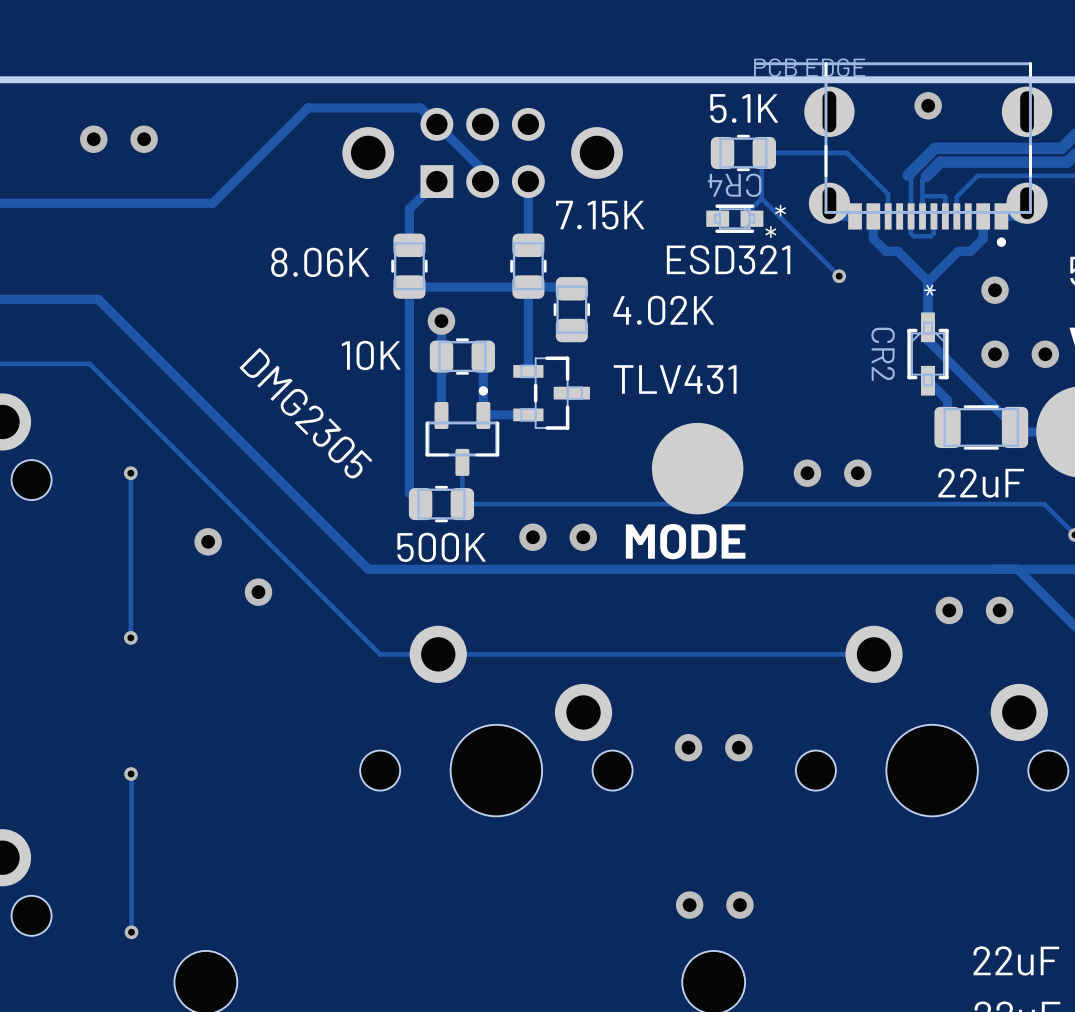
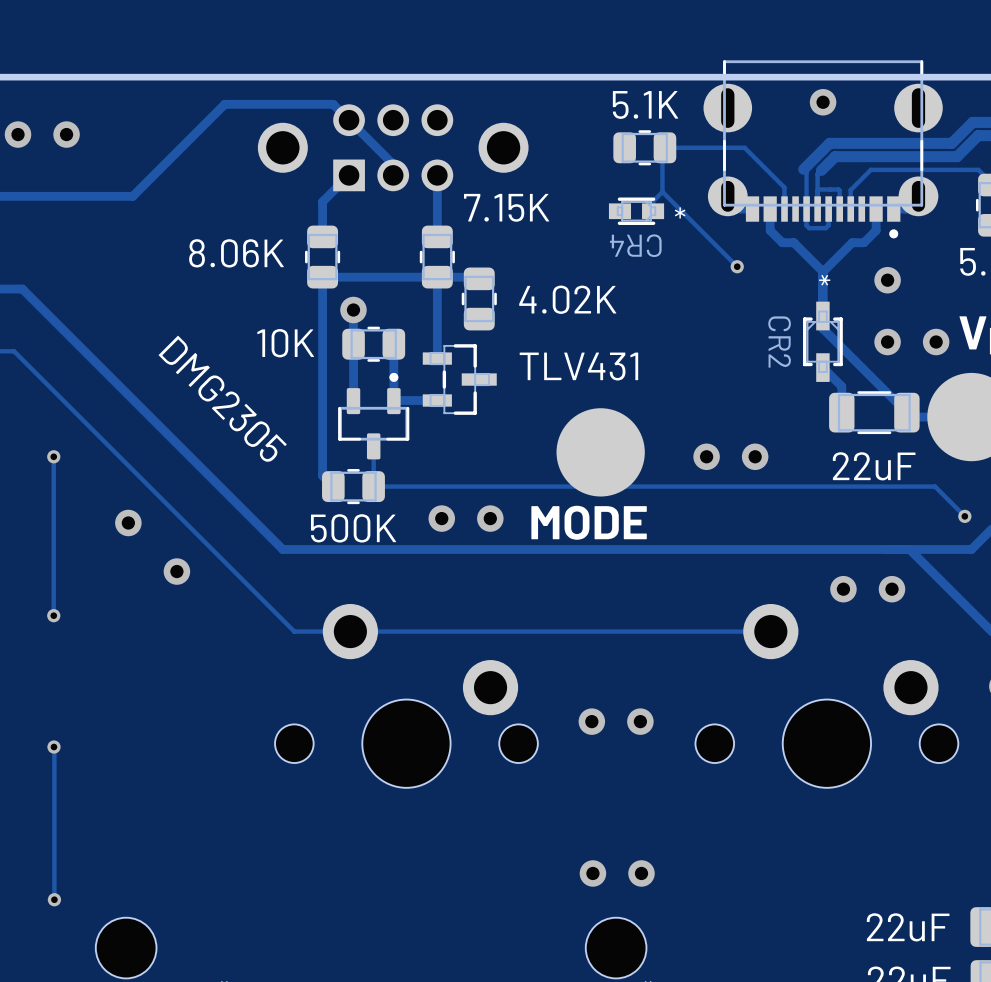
part: (903, 154) -> none
part: none -> (823, 149)
CR4 name position: CR4 (734, 185) -> CR4 (635, 245)
CR4 text rotation: 0° (780, 210) -> 180° (680, 212)
CR4 text: * (770, 231) -> none
CR4 value: ESD321 (728, 259) -> none

